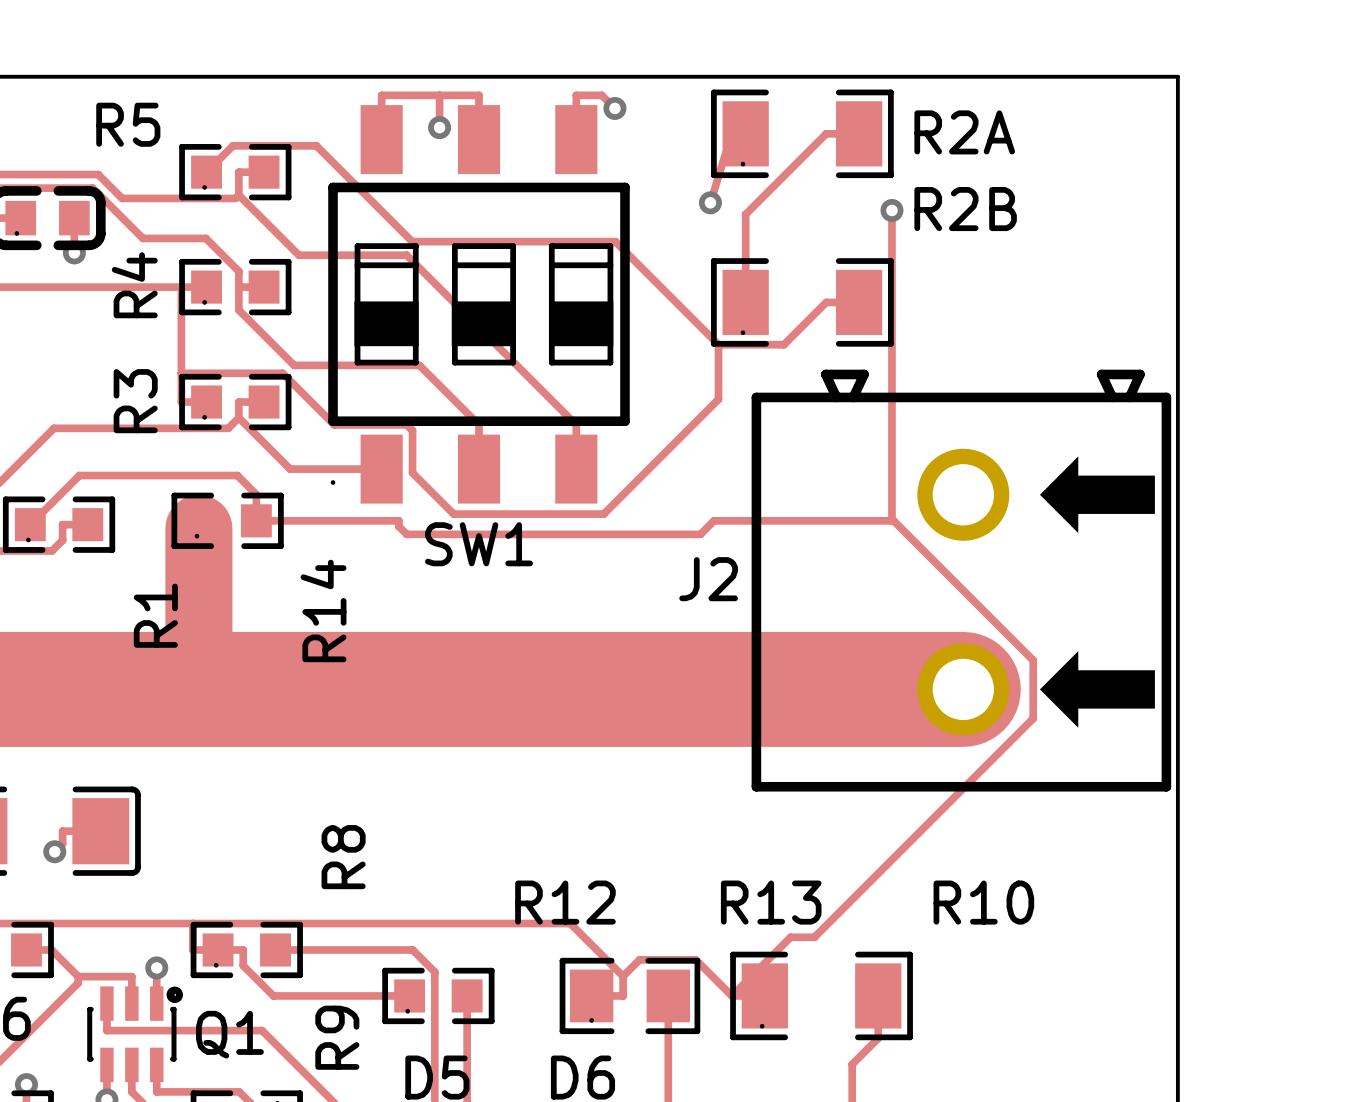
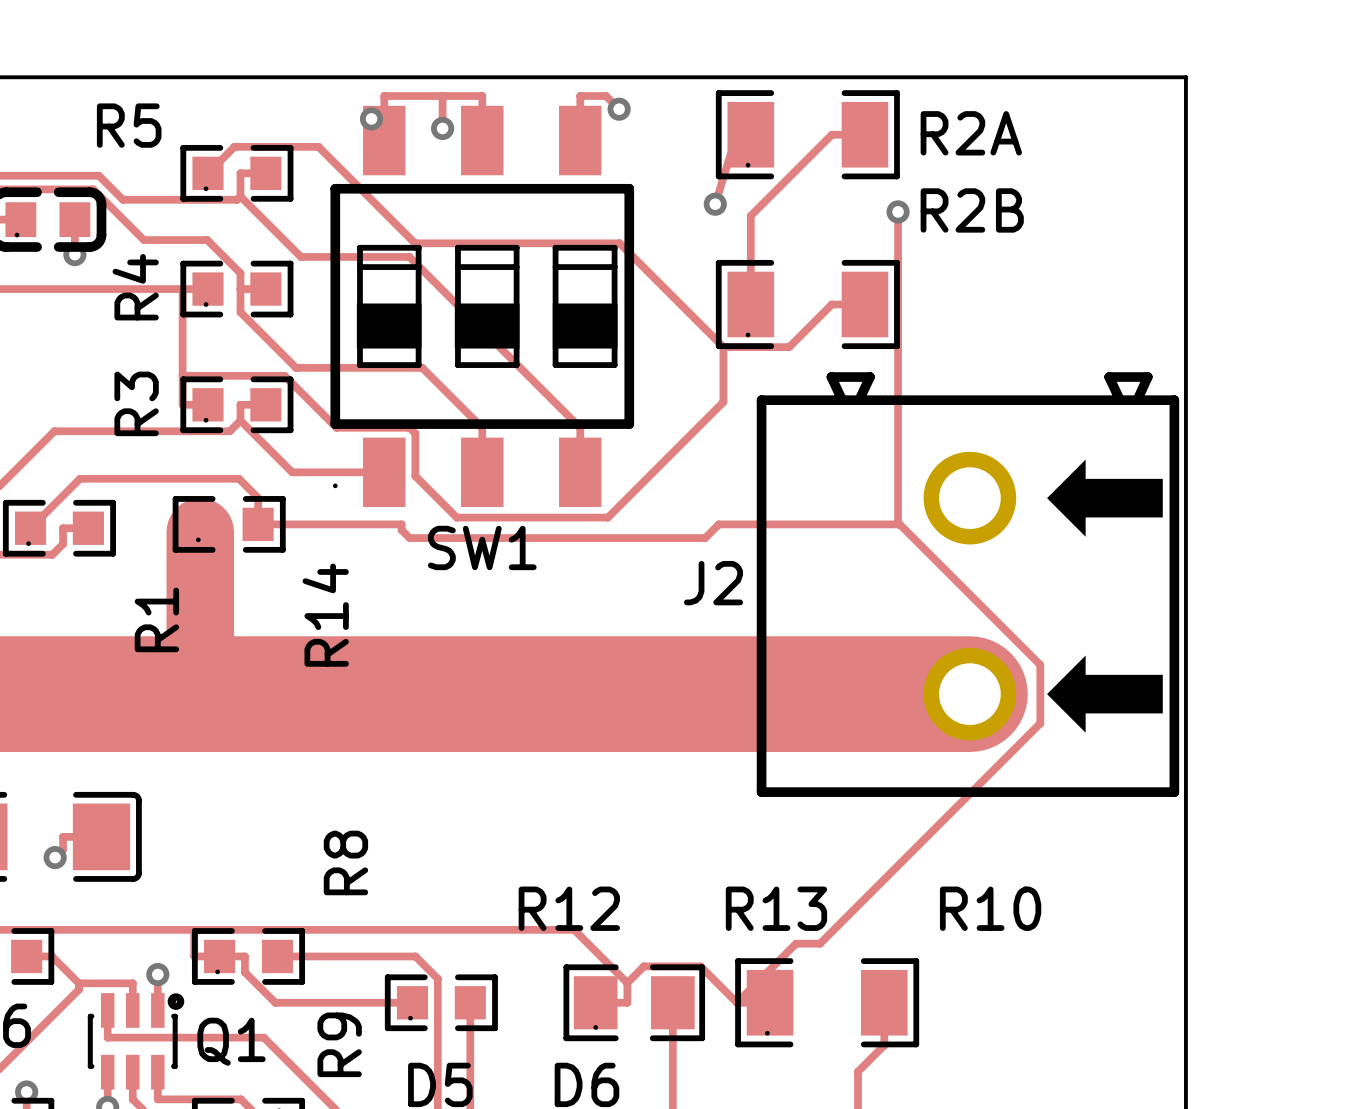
via: none -> (371, 118)

